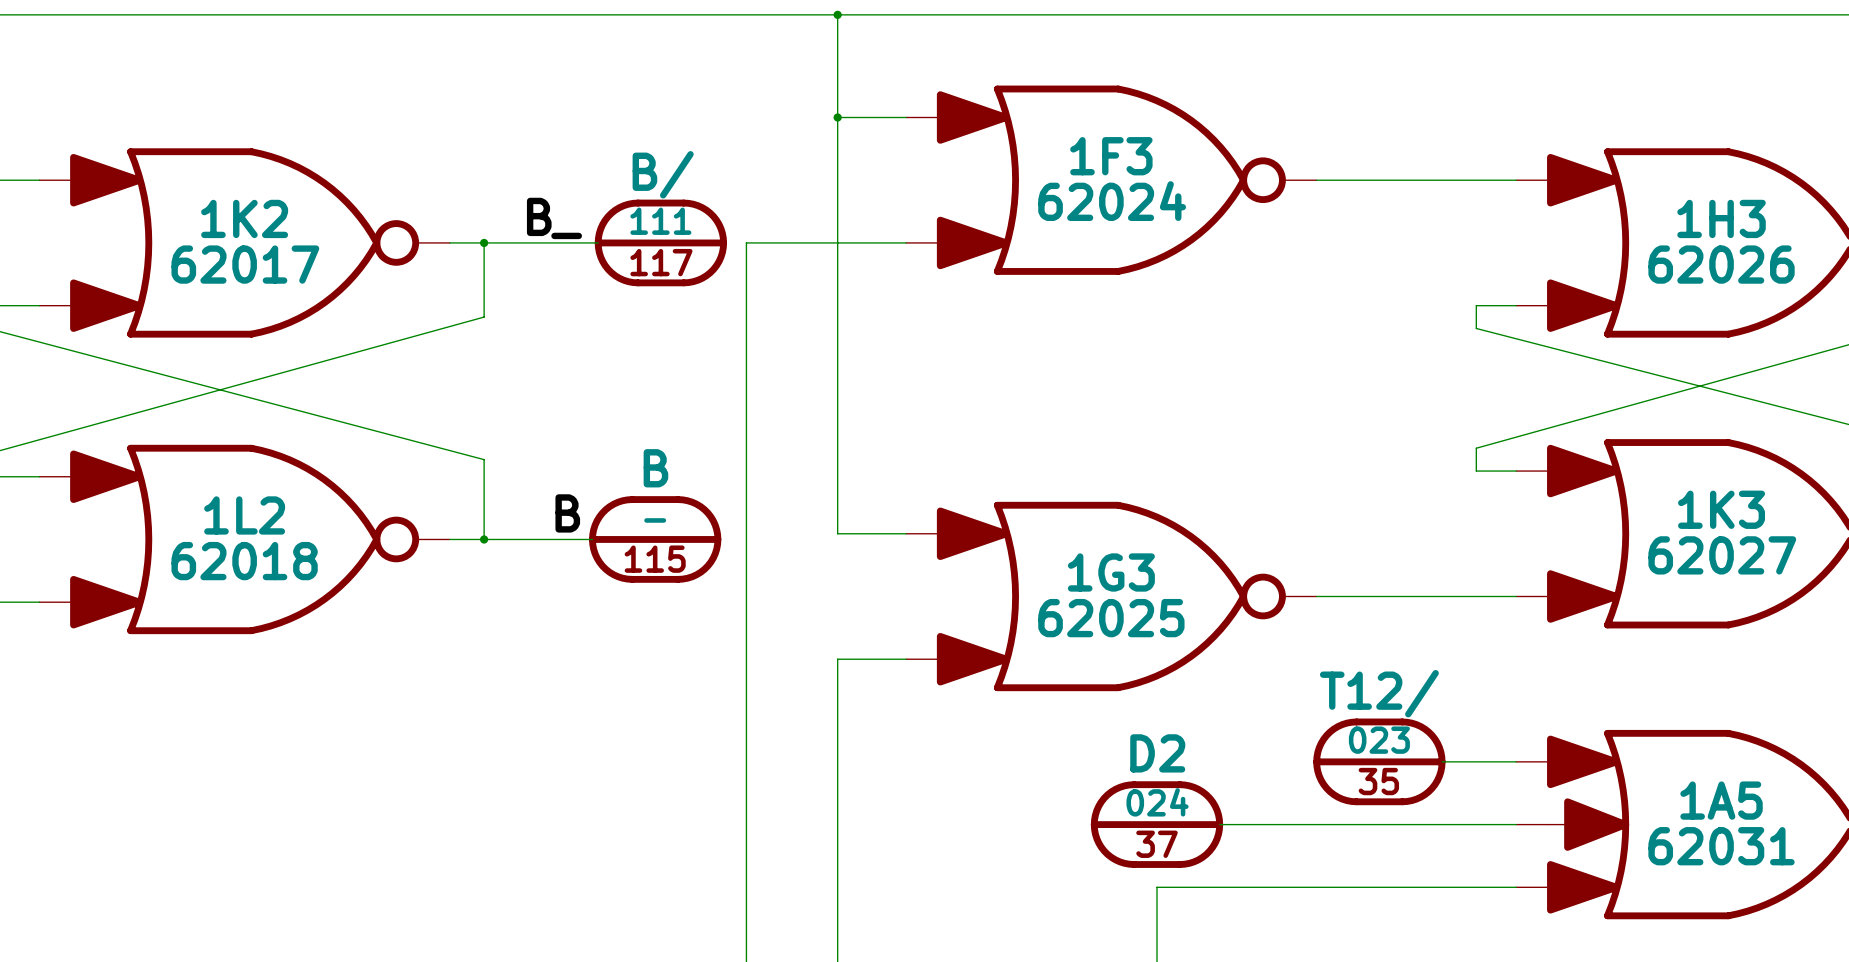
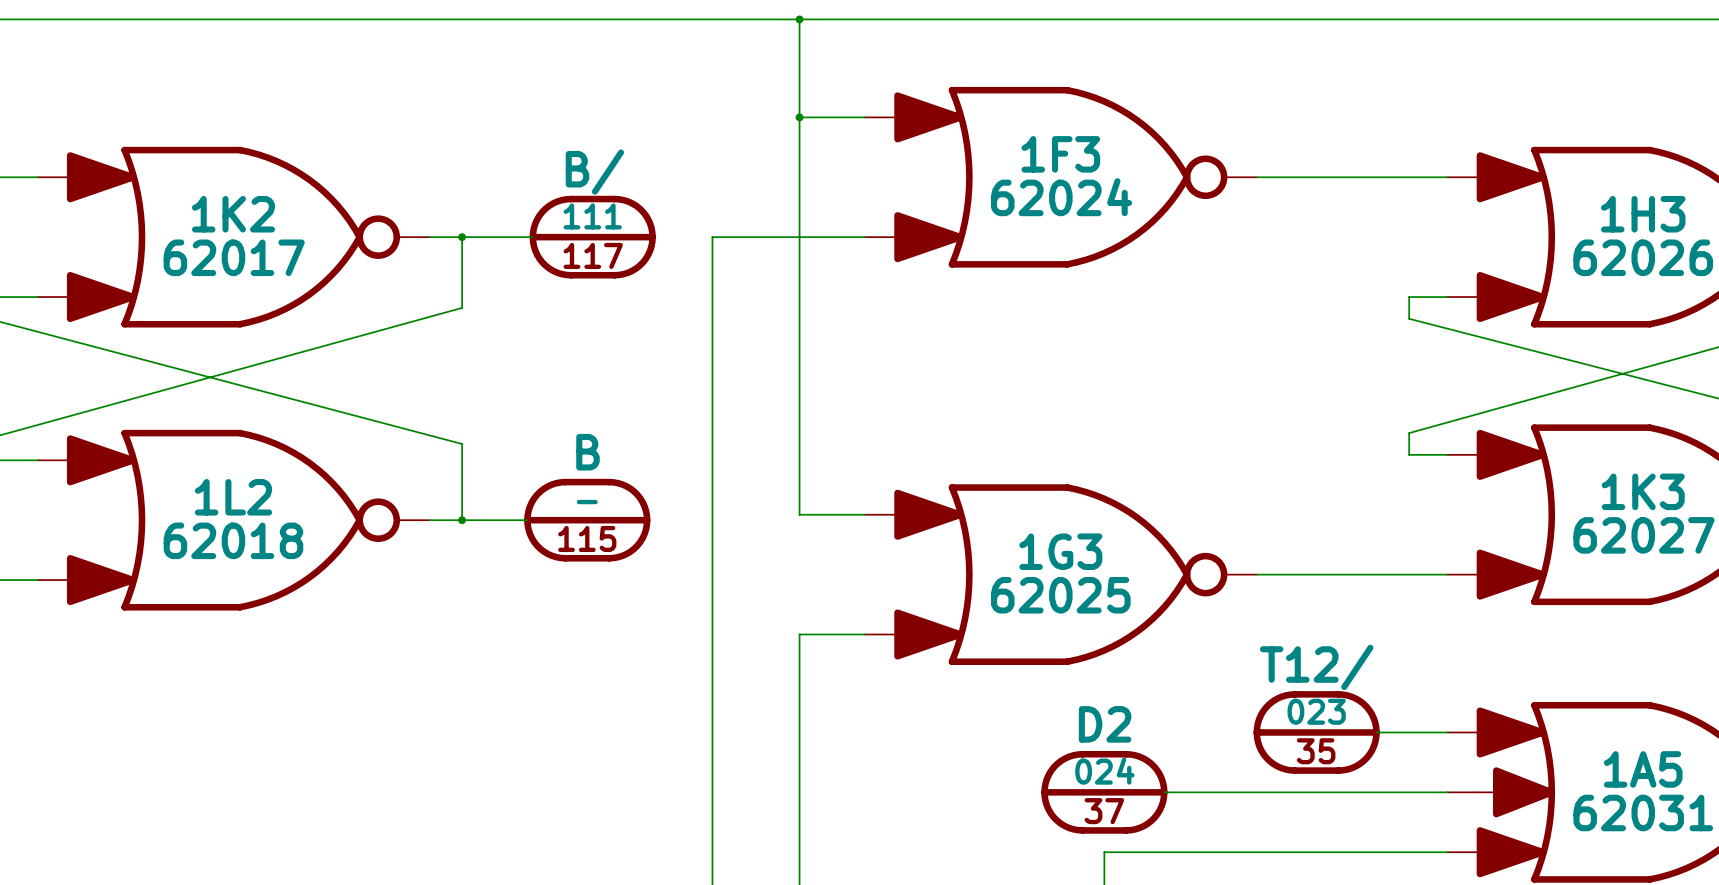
label: B_ (554, 218) -> none
part position: (660, 242) -> (592, 237)
label: B (567, 513) -> none
part position: (655, 539) -> (587, 520)

